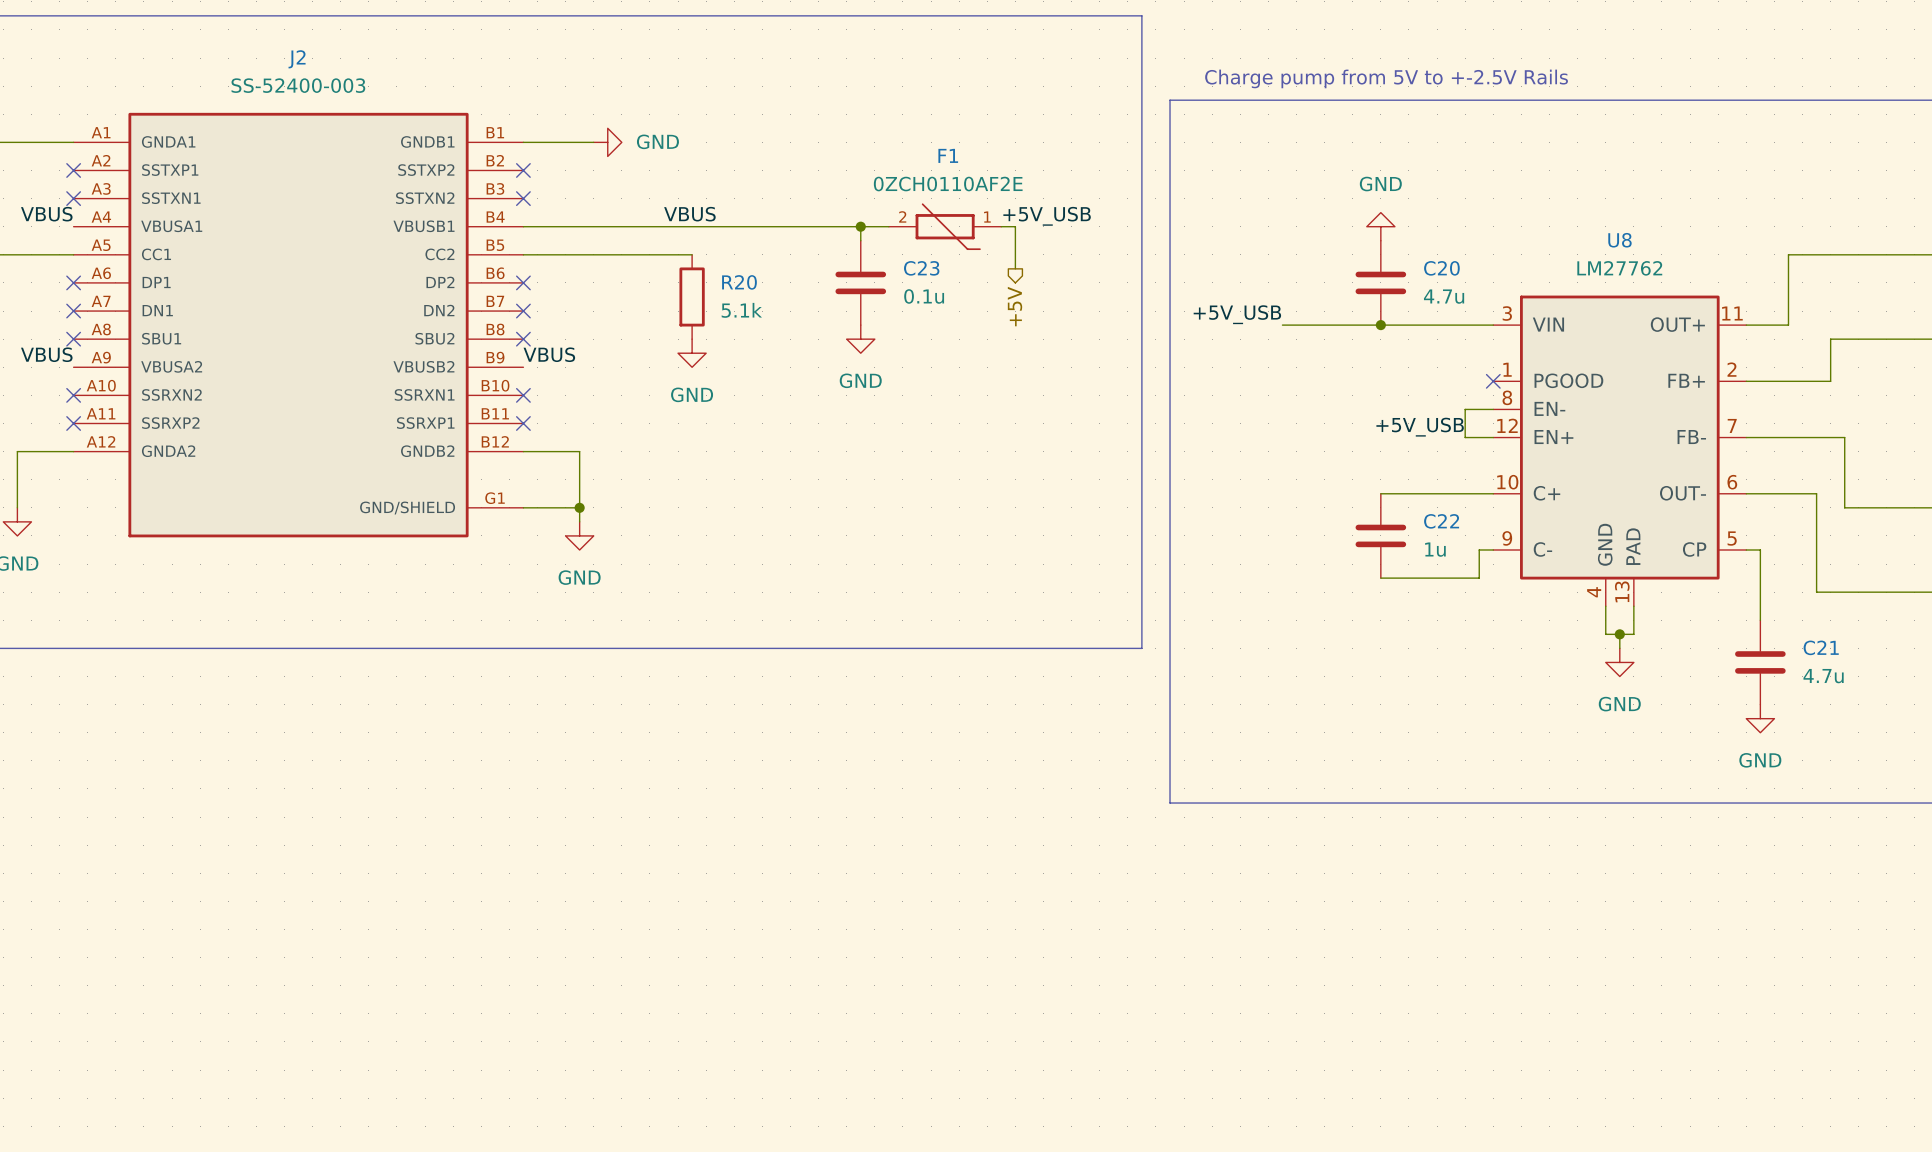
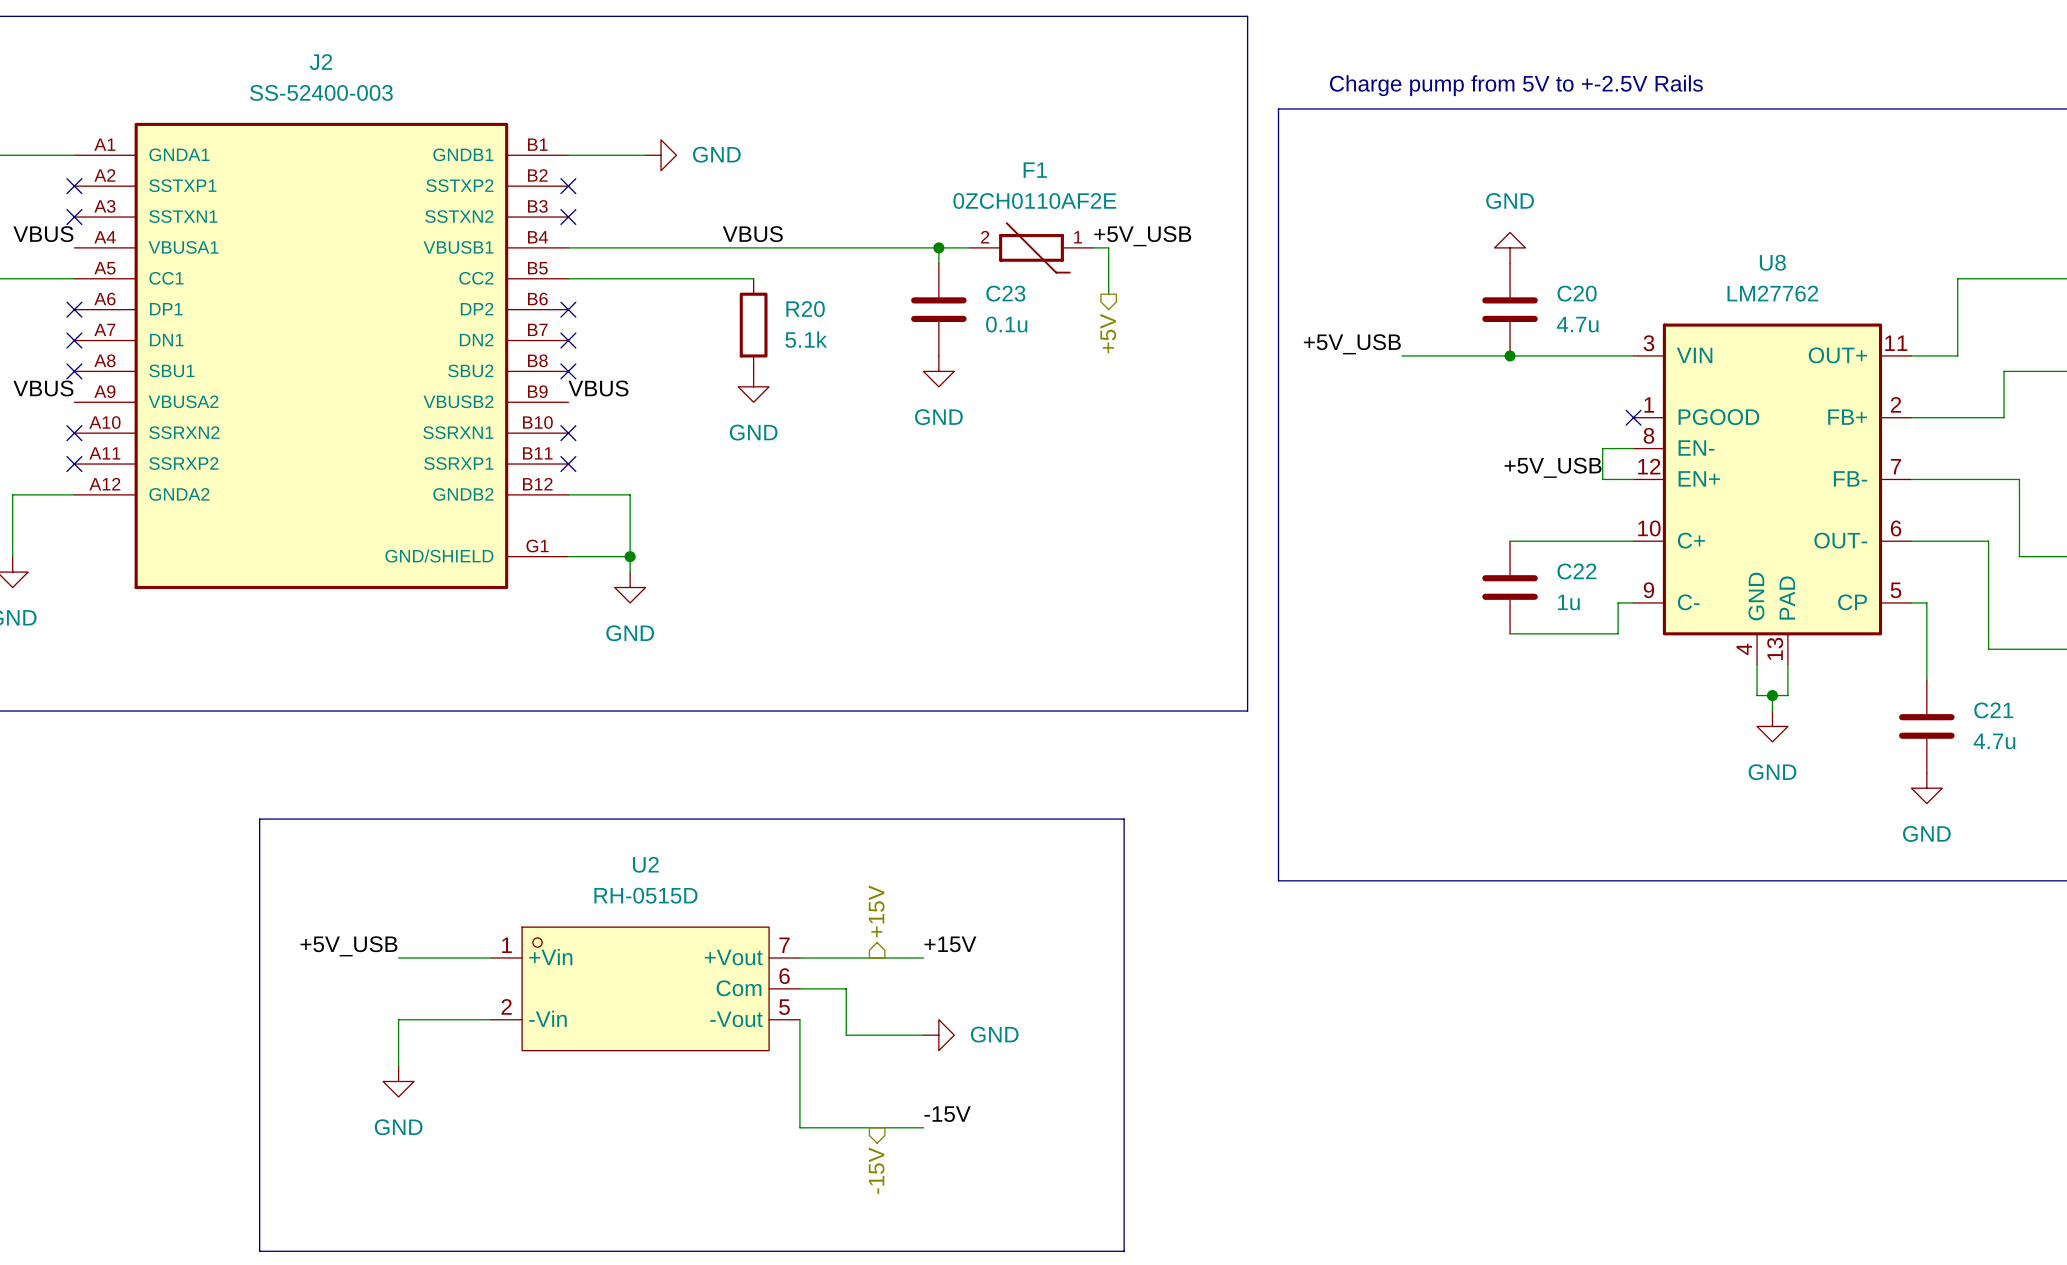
line: none -> (259, 819) (1124, 819) (1124, 1251) (259, 1251) (259, 819)
hierarchical label: none -> +15V (876, 911)
label: none -> +15V (950, 944)
label: none -> +5V_USB (348, 946)
wire: none -> (398, 958) (491, 958)
wire: none -> (799, 958) (923, 958)
U2: none -> RH-0515D (645, 988)
wire: none -> (799, 988) (846, 988) (846, 1035) (923, 1035)
wire: none -> (491, 1019) (398, 1019) (398, 1066)
wire: none -> (799, 1019) (799, 1127) (923, 1127)
power symbol: none -> GND (938, 1035)
power symbol: none -> GND (398, 1081)
label: none -> -15V (947, 1114)
hierarchical label: none -> -15V (876, 1170)

